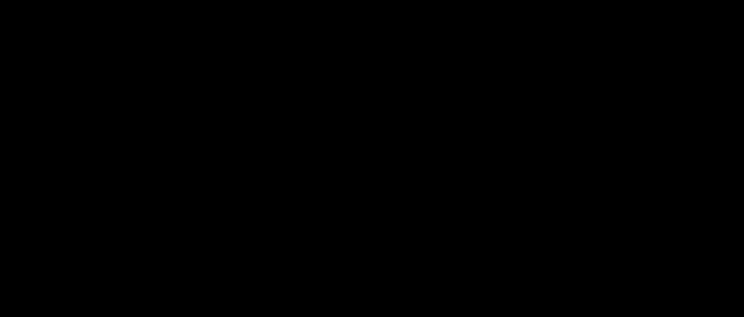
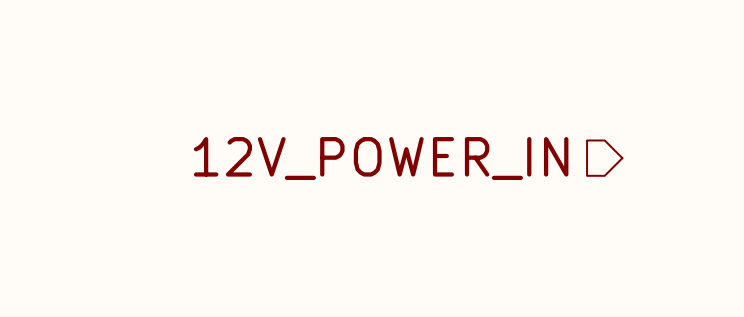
hierarchical label: none -> 12V_POWER_IN (381, 158)

